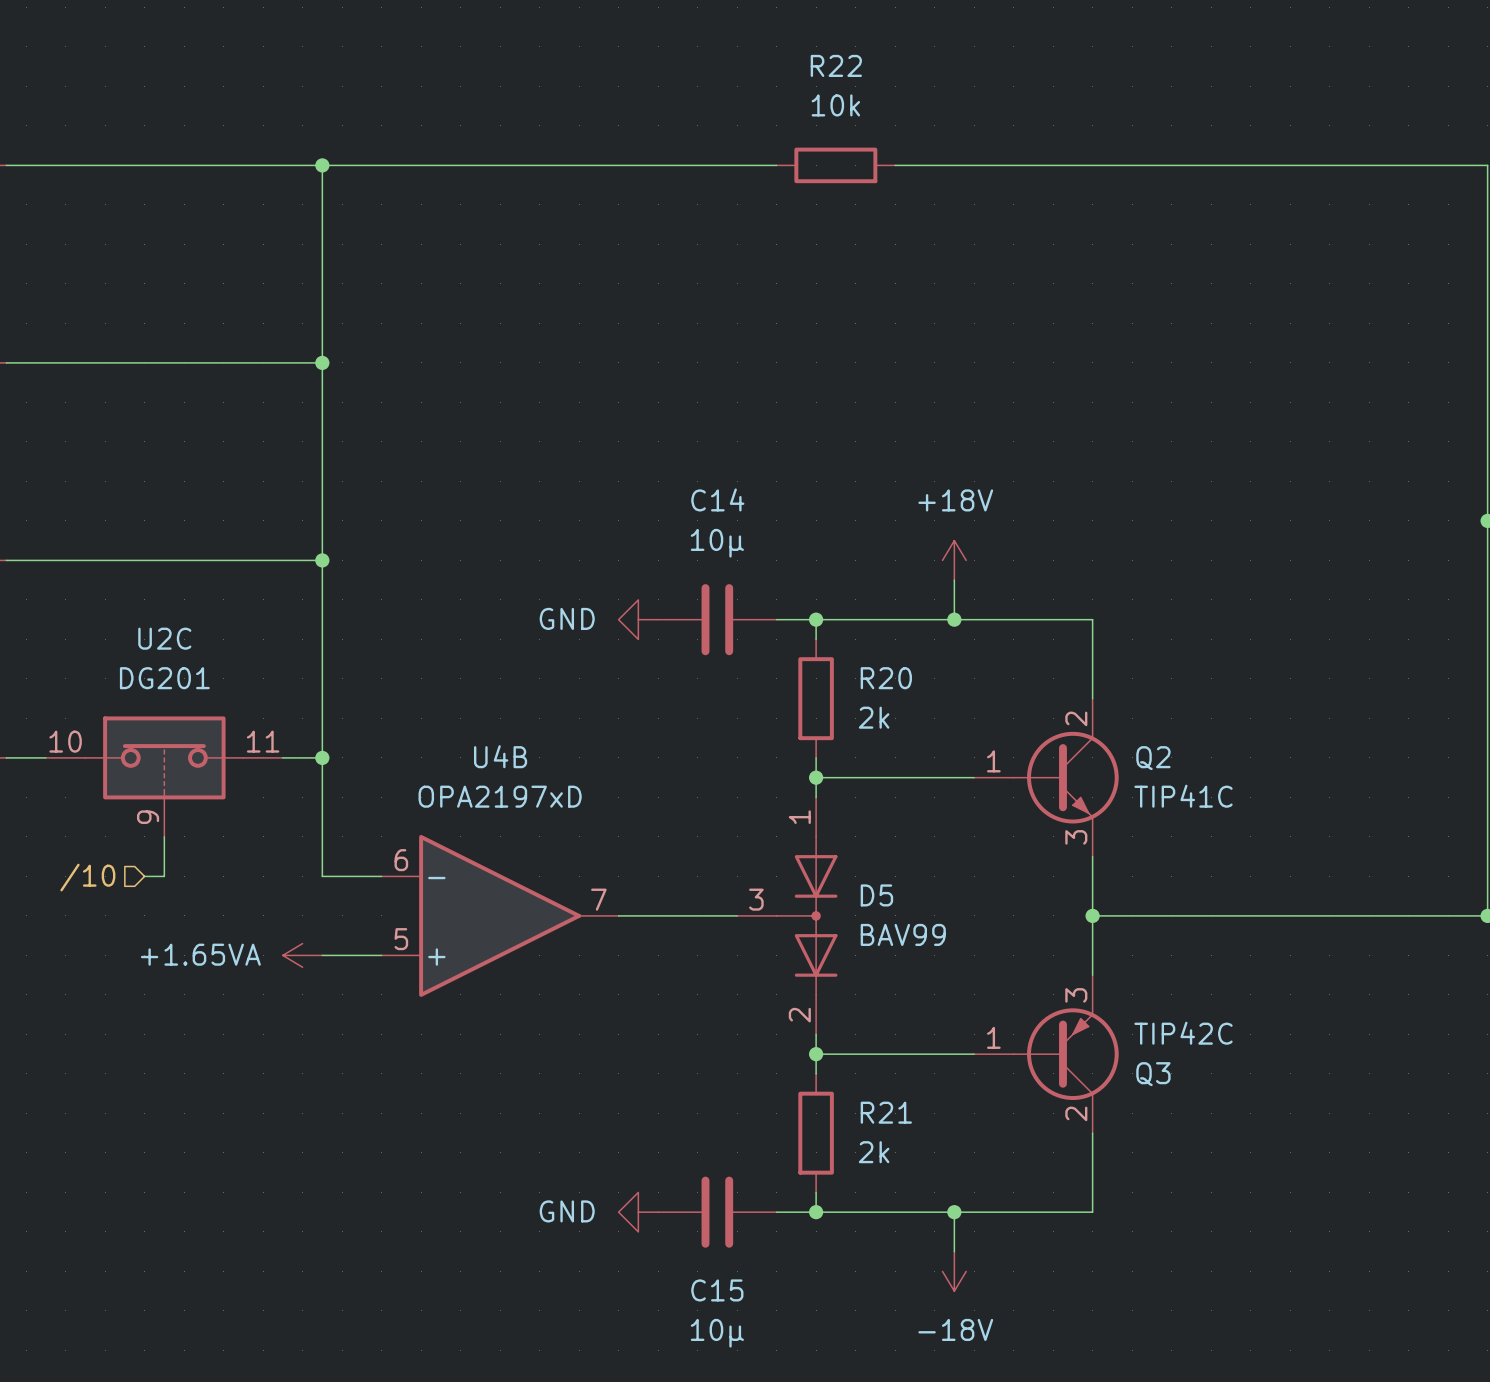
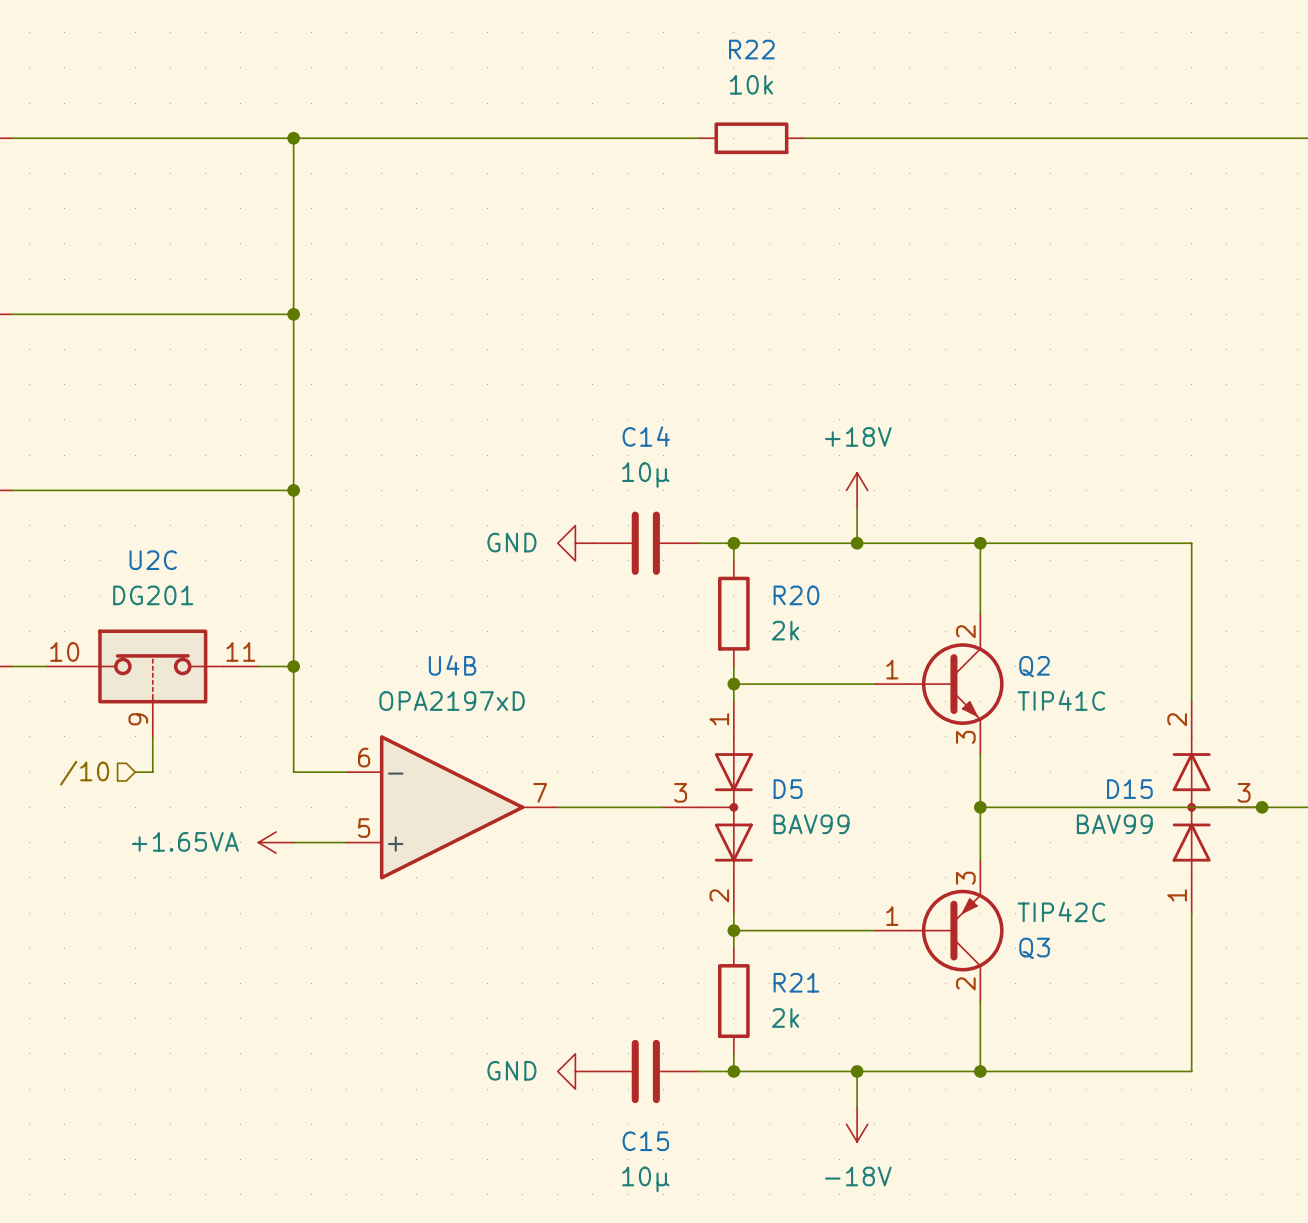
wire: none -> (980, 543) (1191, 543) (1191, 701)
junction: none -> (980, 543)
D15: none -> BAV99 (1217, 807)
junction: none -> (1262, 807)
wire: none -> (1191, 913) (1191, 1071) (980, 1071)
junction: none -> (980, 1071)

